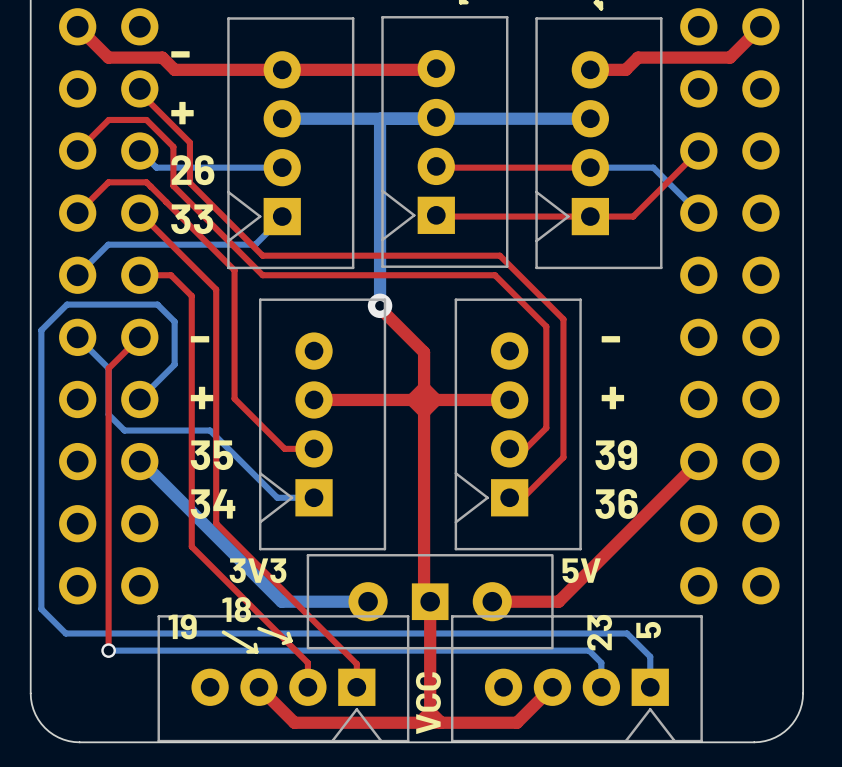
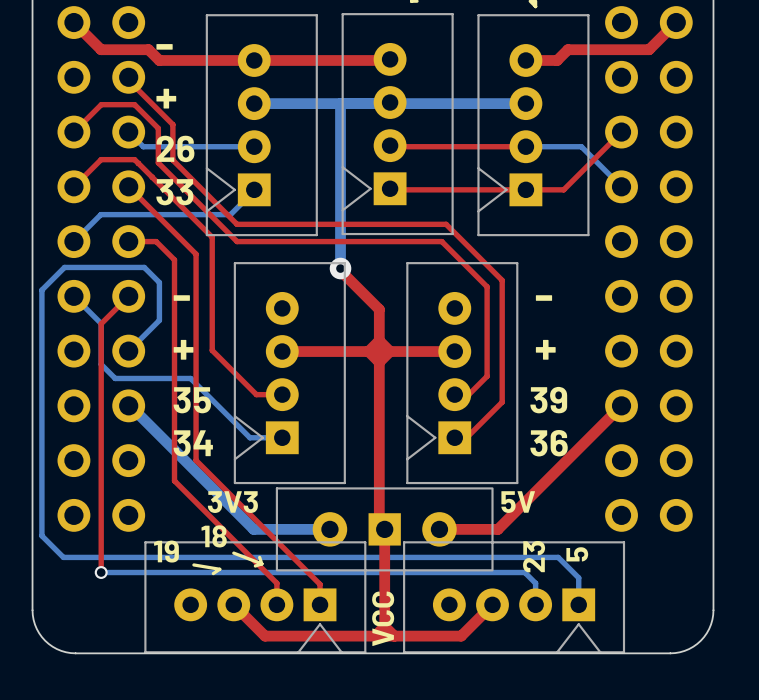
line: (223, 632) (256, 651) -> none
line: none -> (193, 564) (219, 569) (213, 573)
line: (255, 644) (256, 651) -> none
line: (248, 651) (256, 651) -> none

